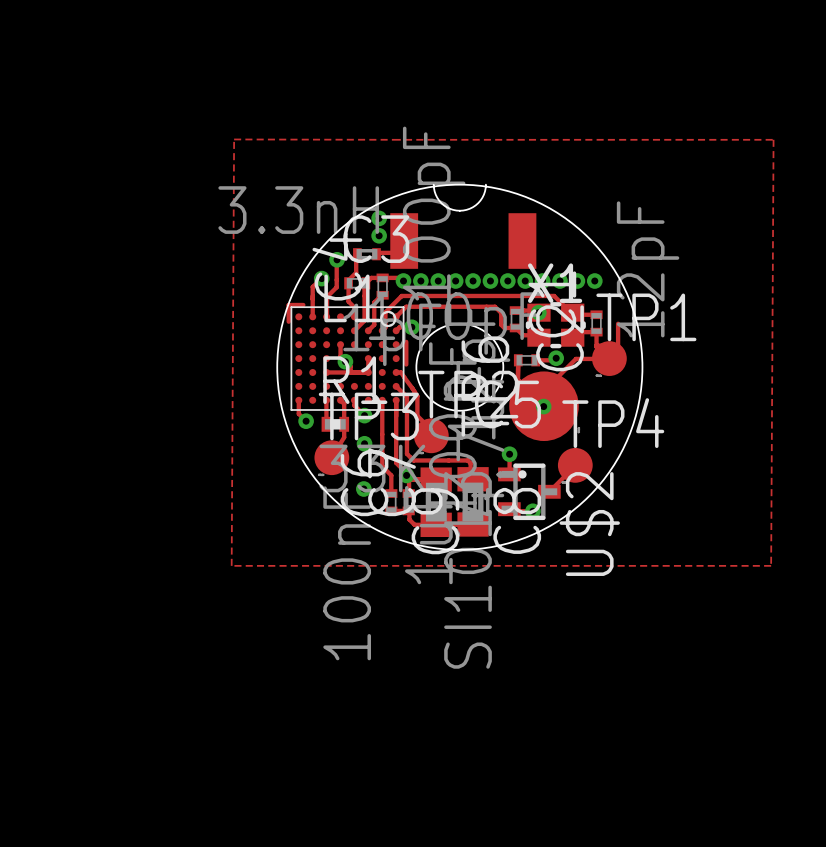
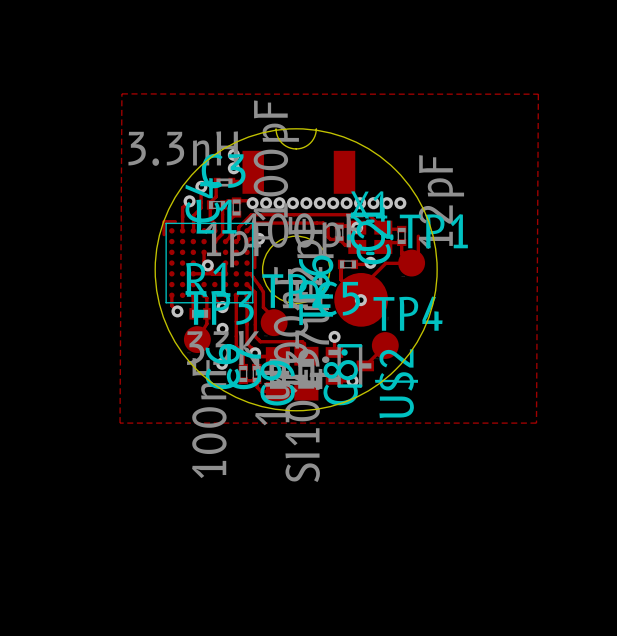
drawing: [380, 310, 397, 328] -> none

